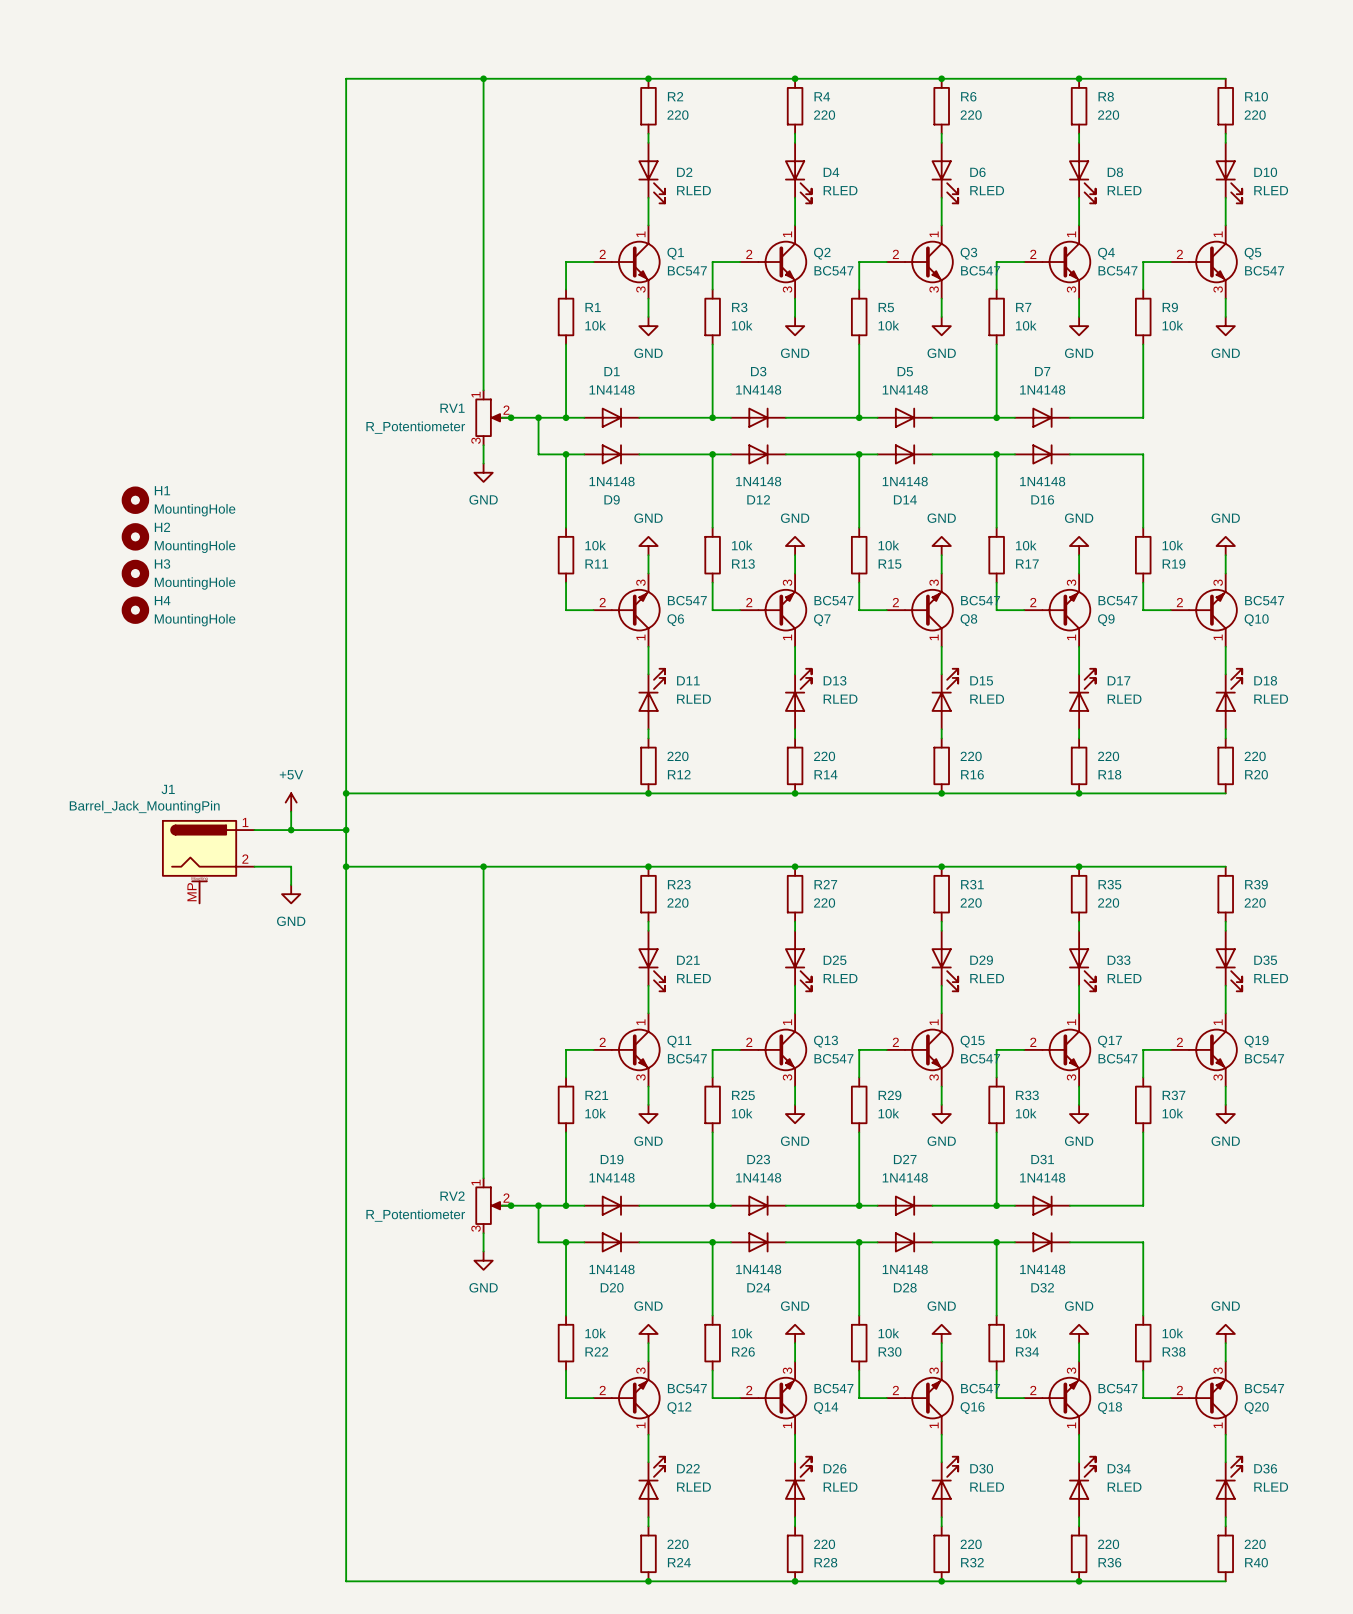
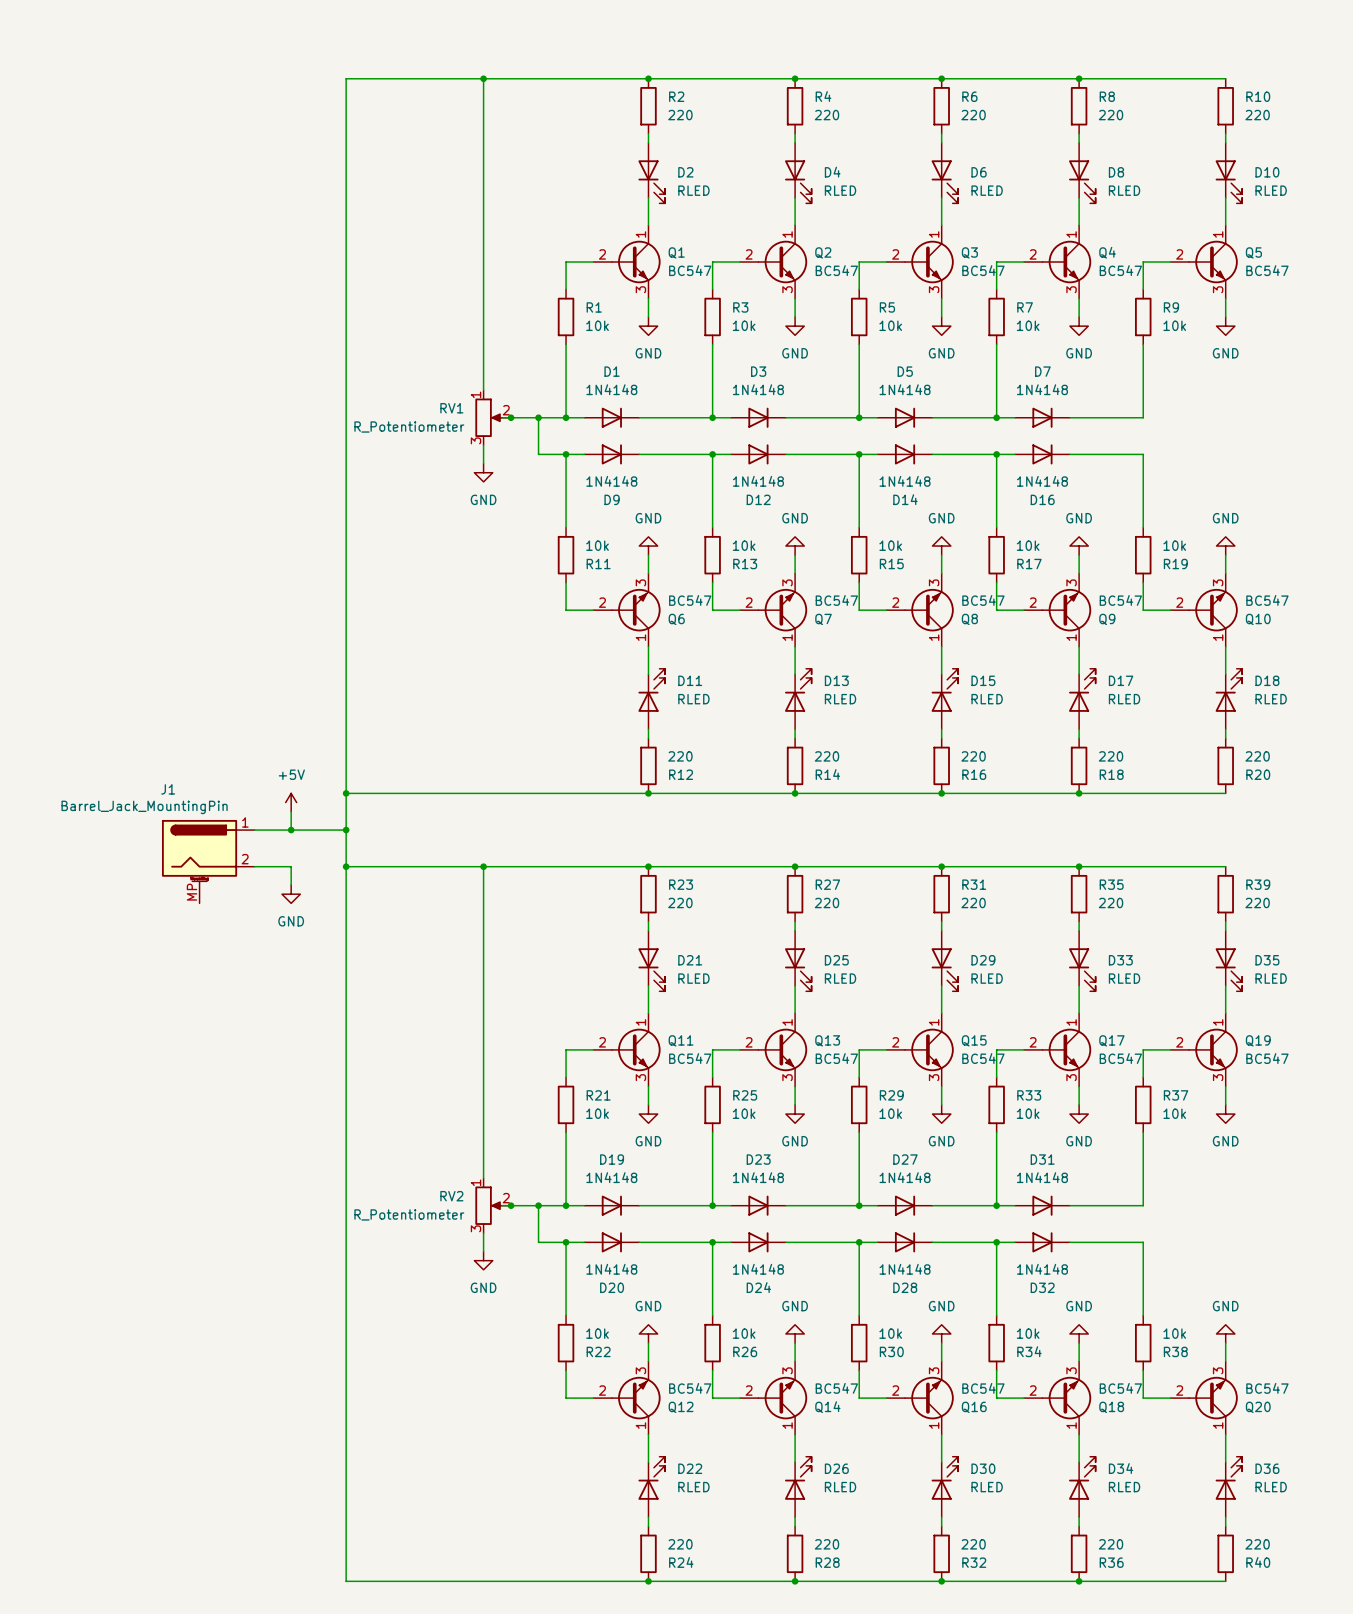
H1: MountingHole (135, 500) -> none
H2: MountingHole (135, 536) -> none
H3: MountingHole (135, 573) -> none
H4: MountingHole (135, 610) -> none

